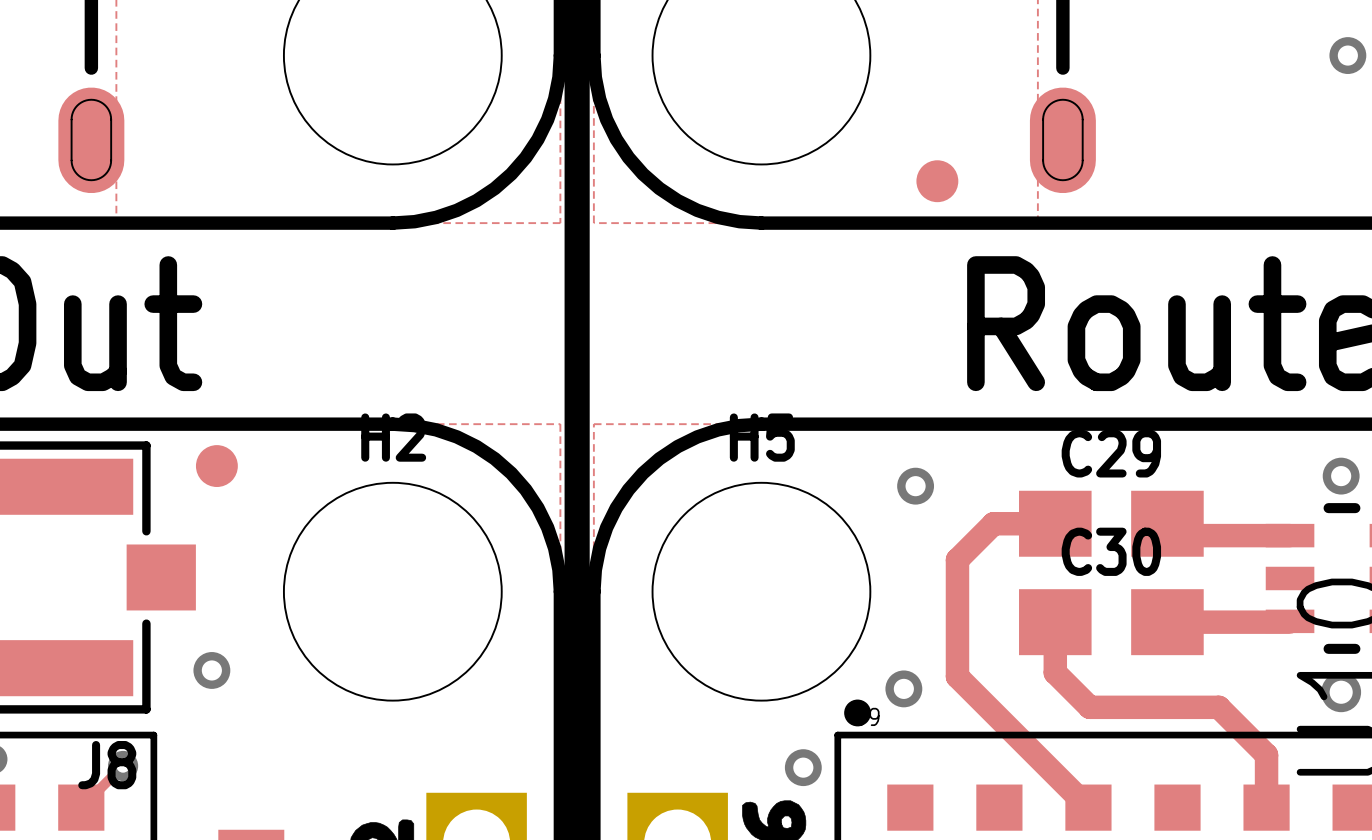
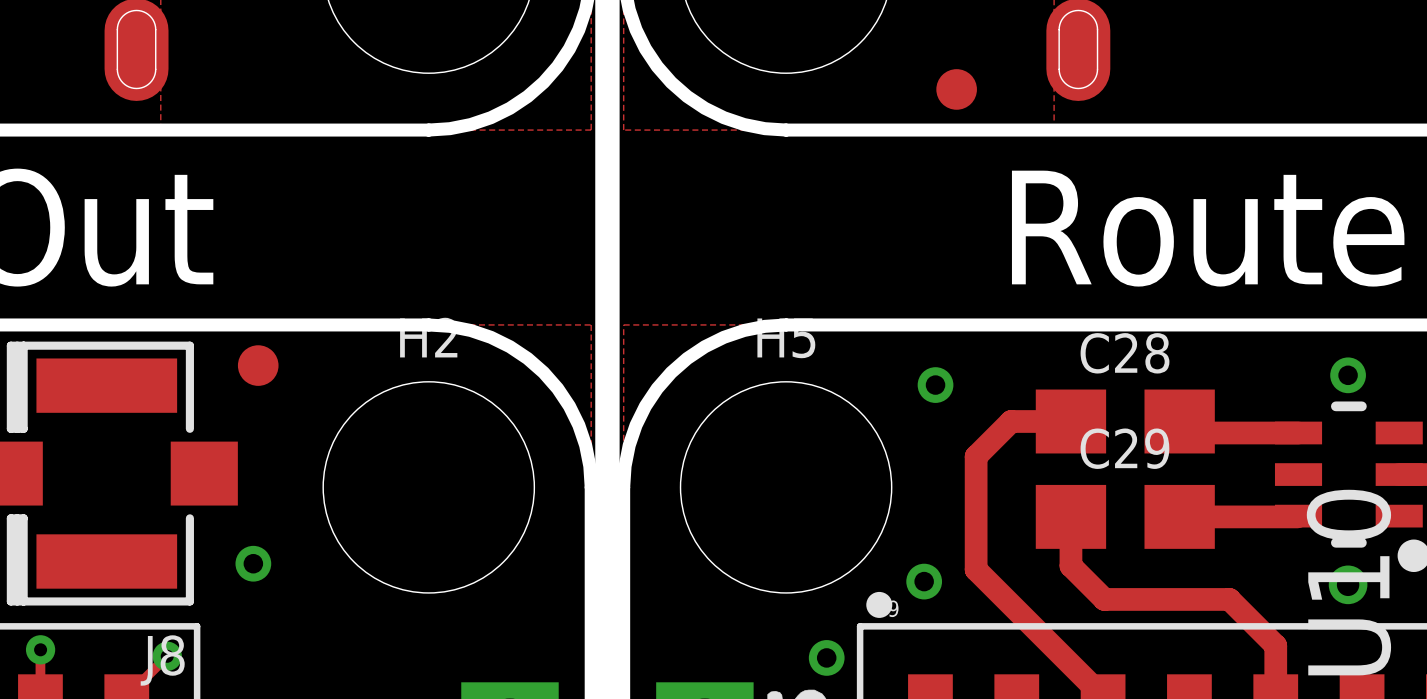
C29 name: C29 (1111, 453) -> C28 (1125, 353)
C30 name: C30 (1111, 551) -> C29 (1124, 448)

